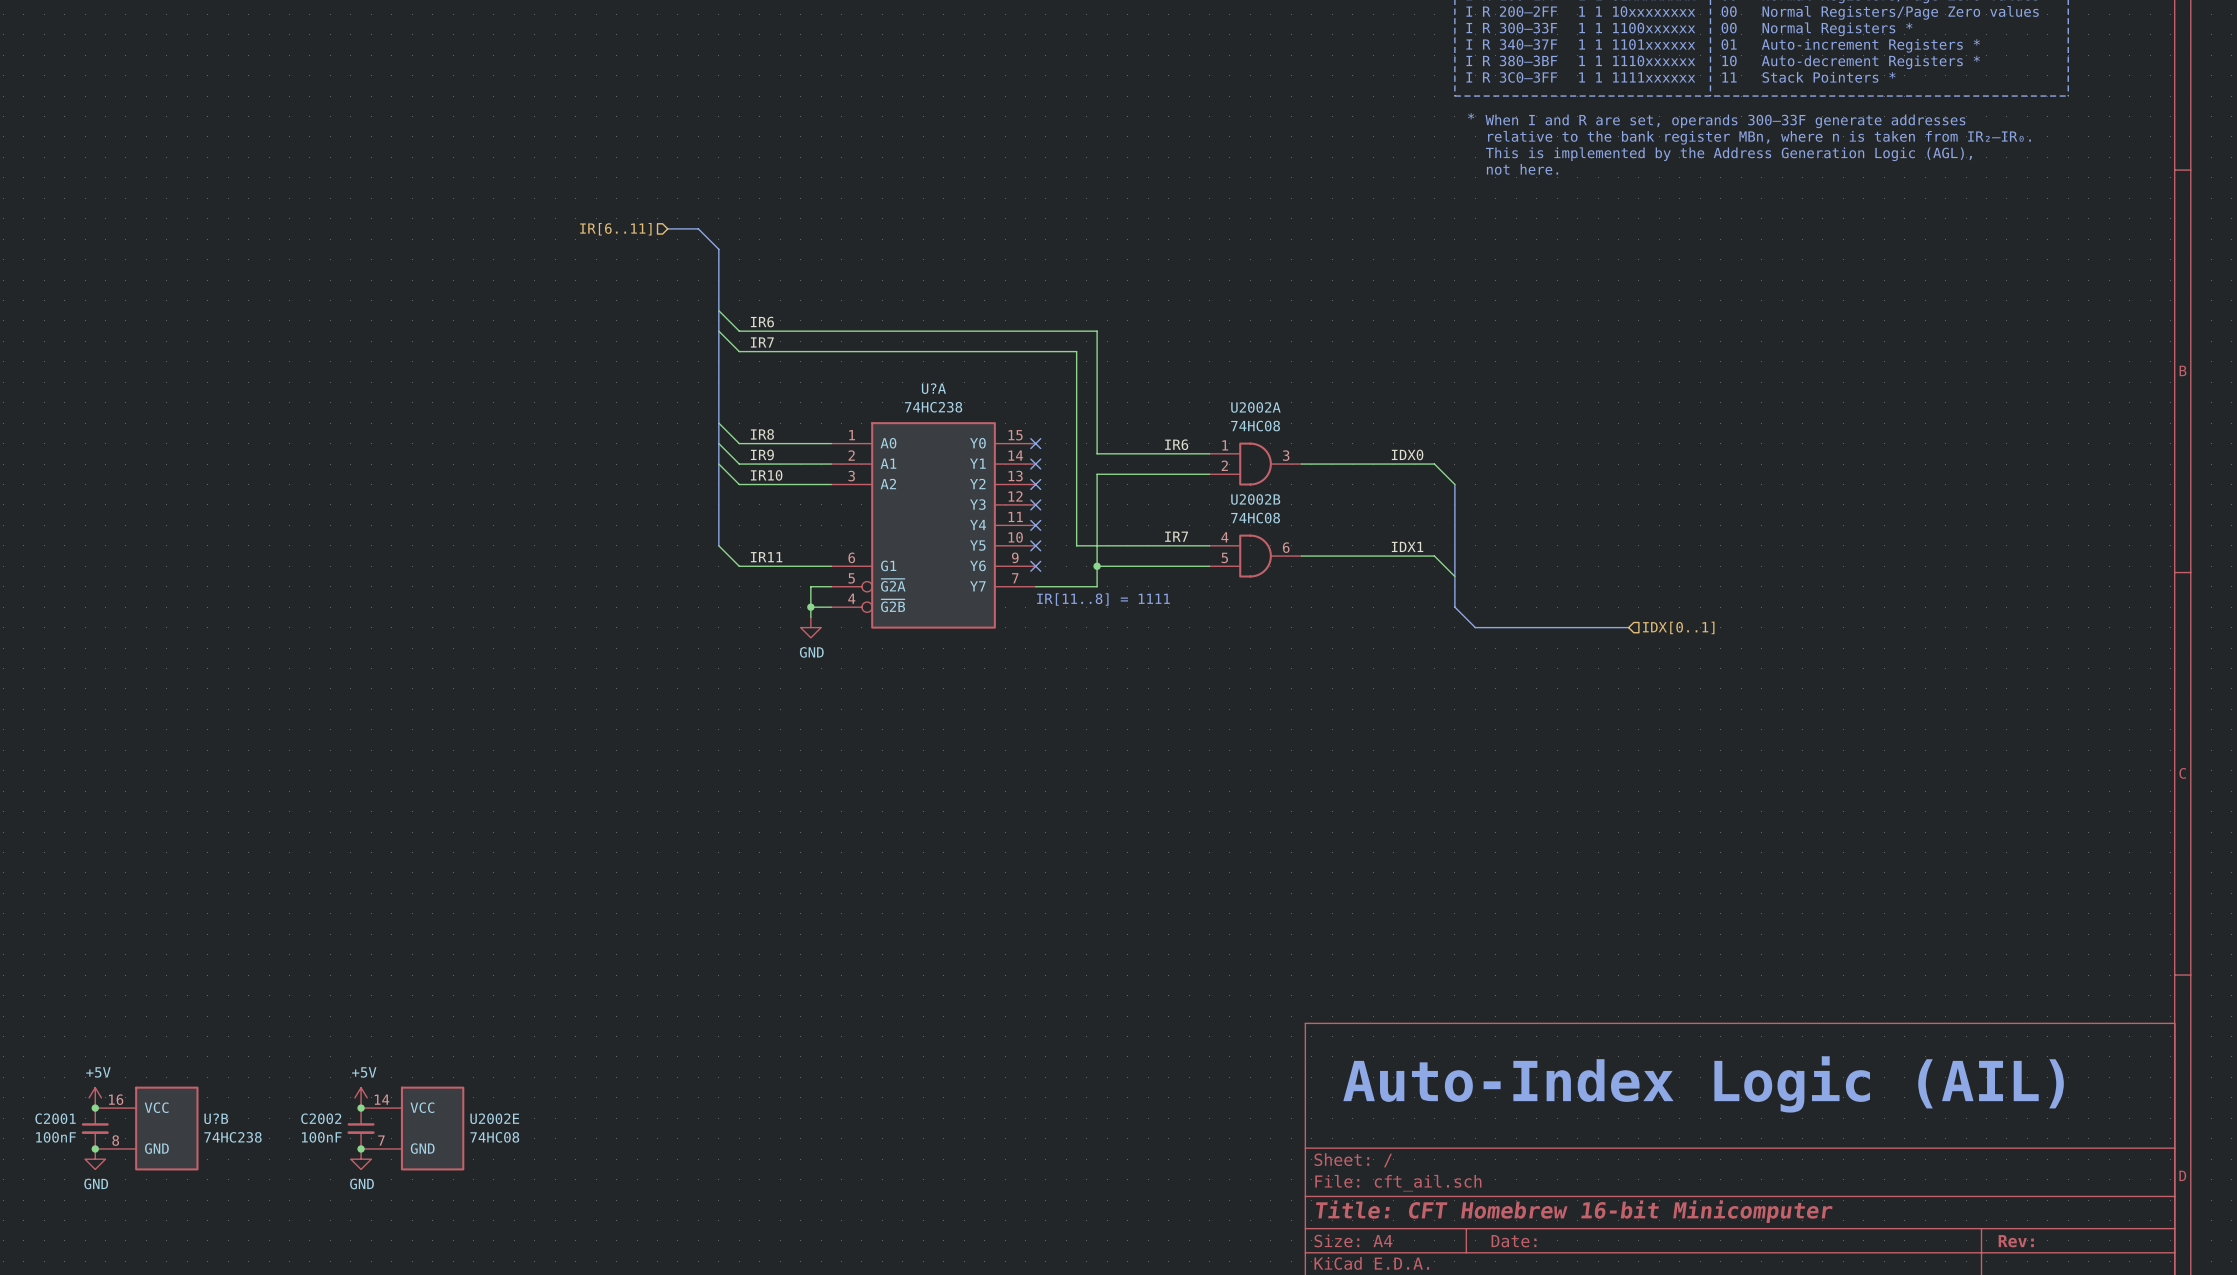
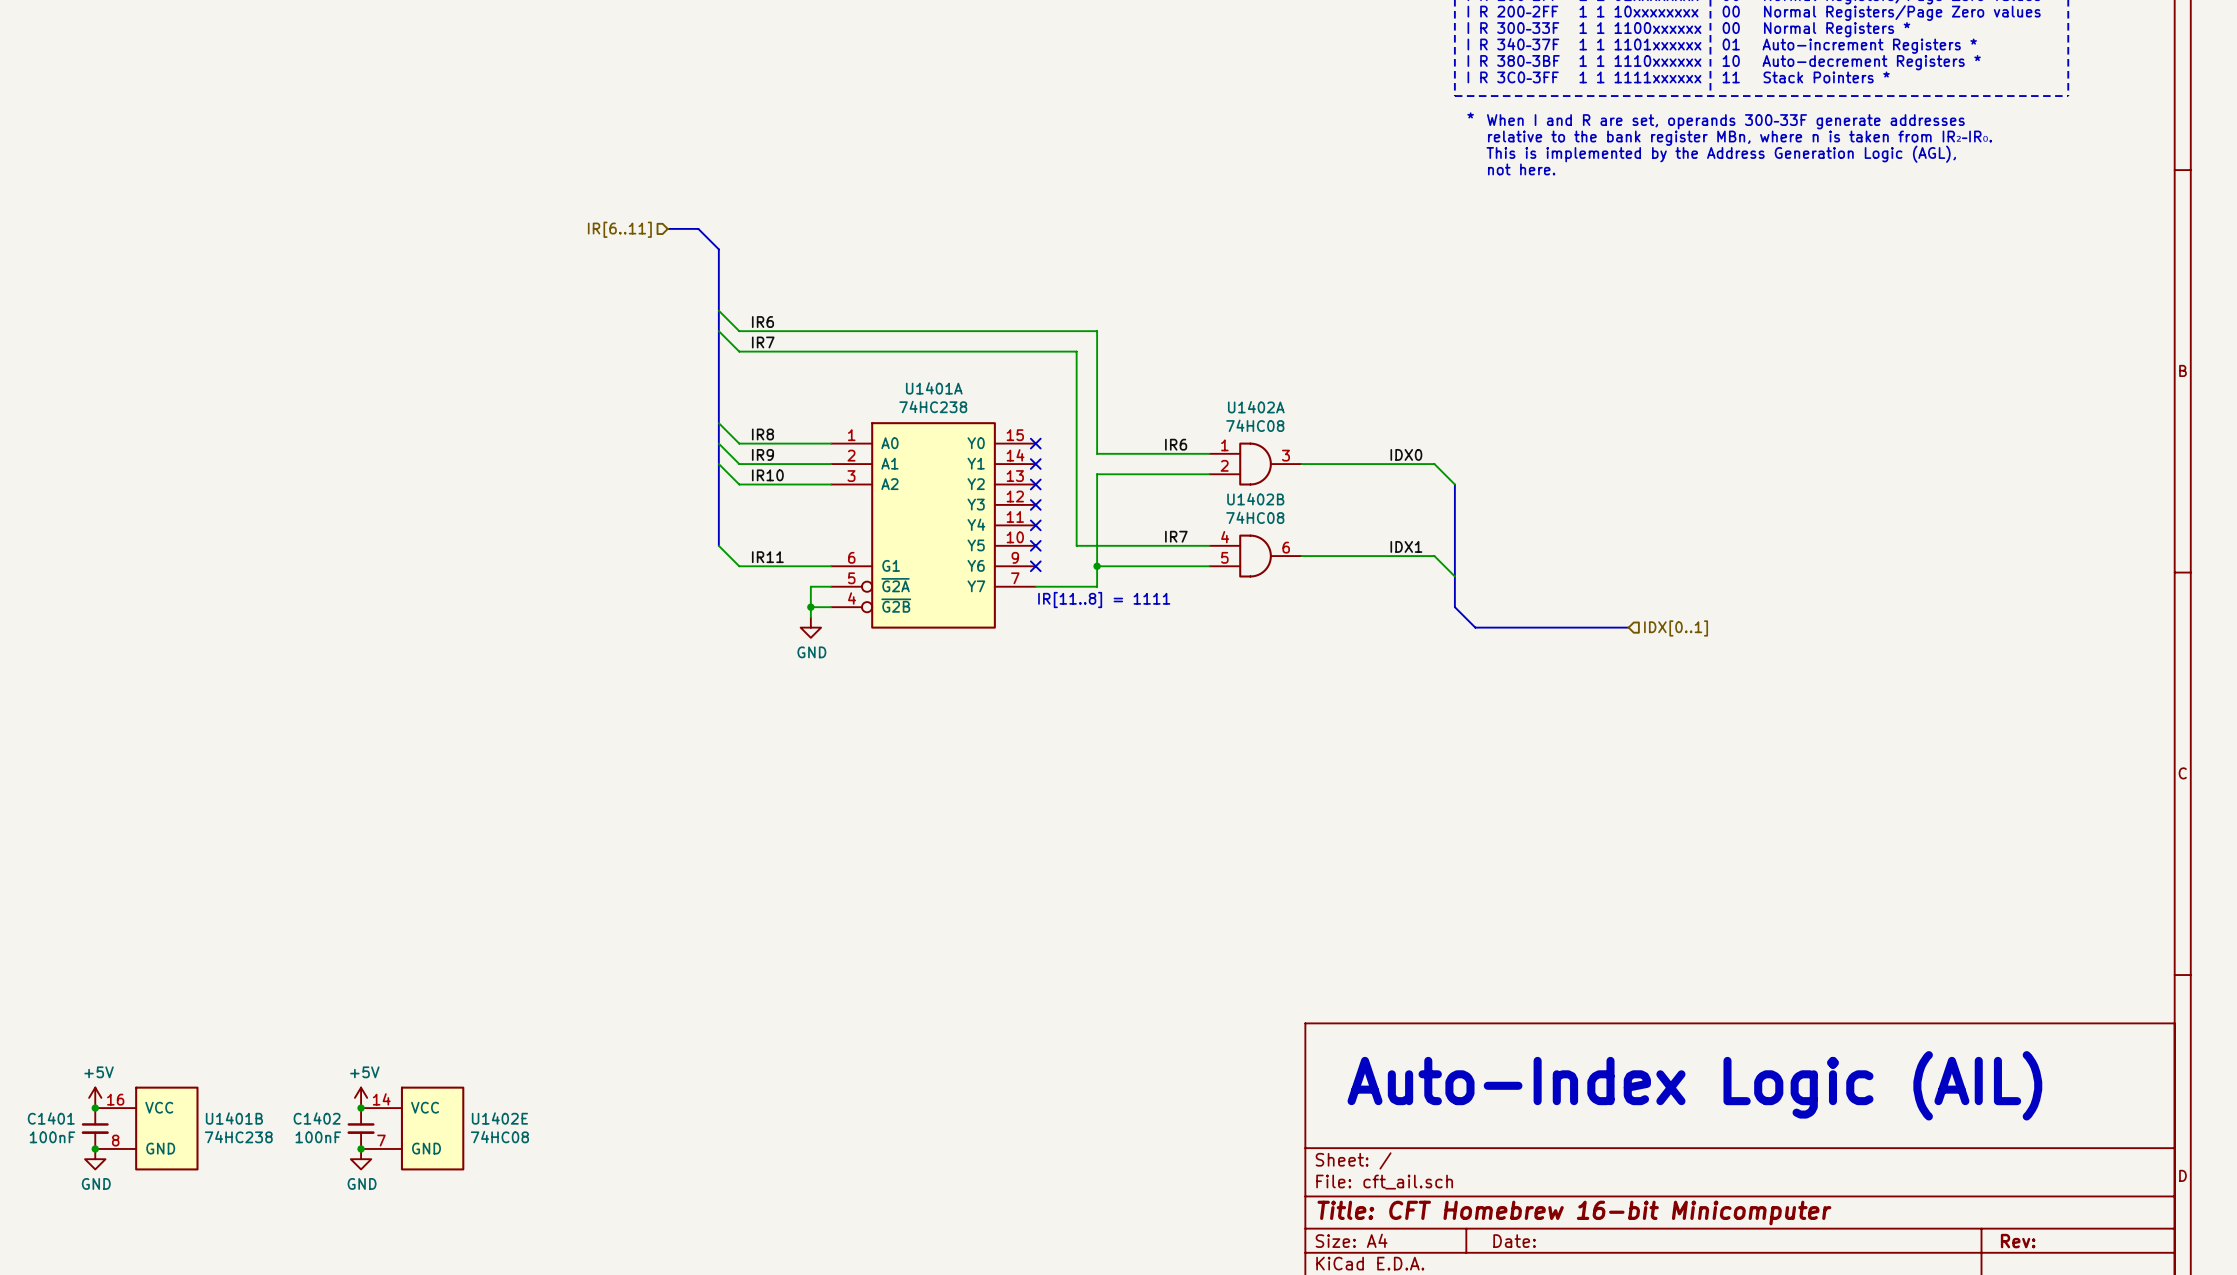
U?A name: U?A (933, 388) -> U1401A (934, 388)
U2002A name: U2002A (1255, 407) -> U1402A (1256, 407)
U2002B name: U2002B (1255, 499) -> U1402B (1255, 499)
C2001 name: C2001 (55, 1118) -> C1401 (51, 1118)
U?B name: U?B (216, 1118) -> U1401B (234, 1118)
C2002 name: C2002 (321, 1118) -> C1402 (317, 1118)
U2002E name: U2002E (494, 1118) -> U1402E (499, 1118)

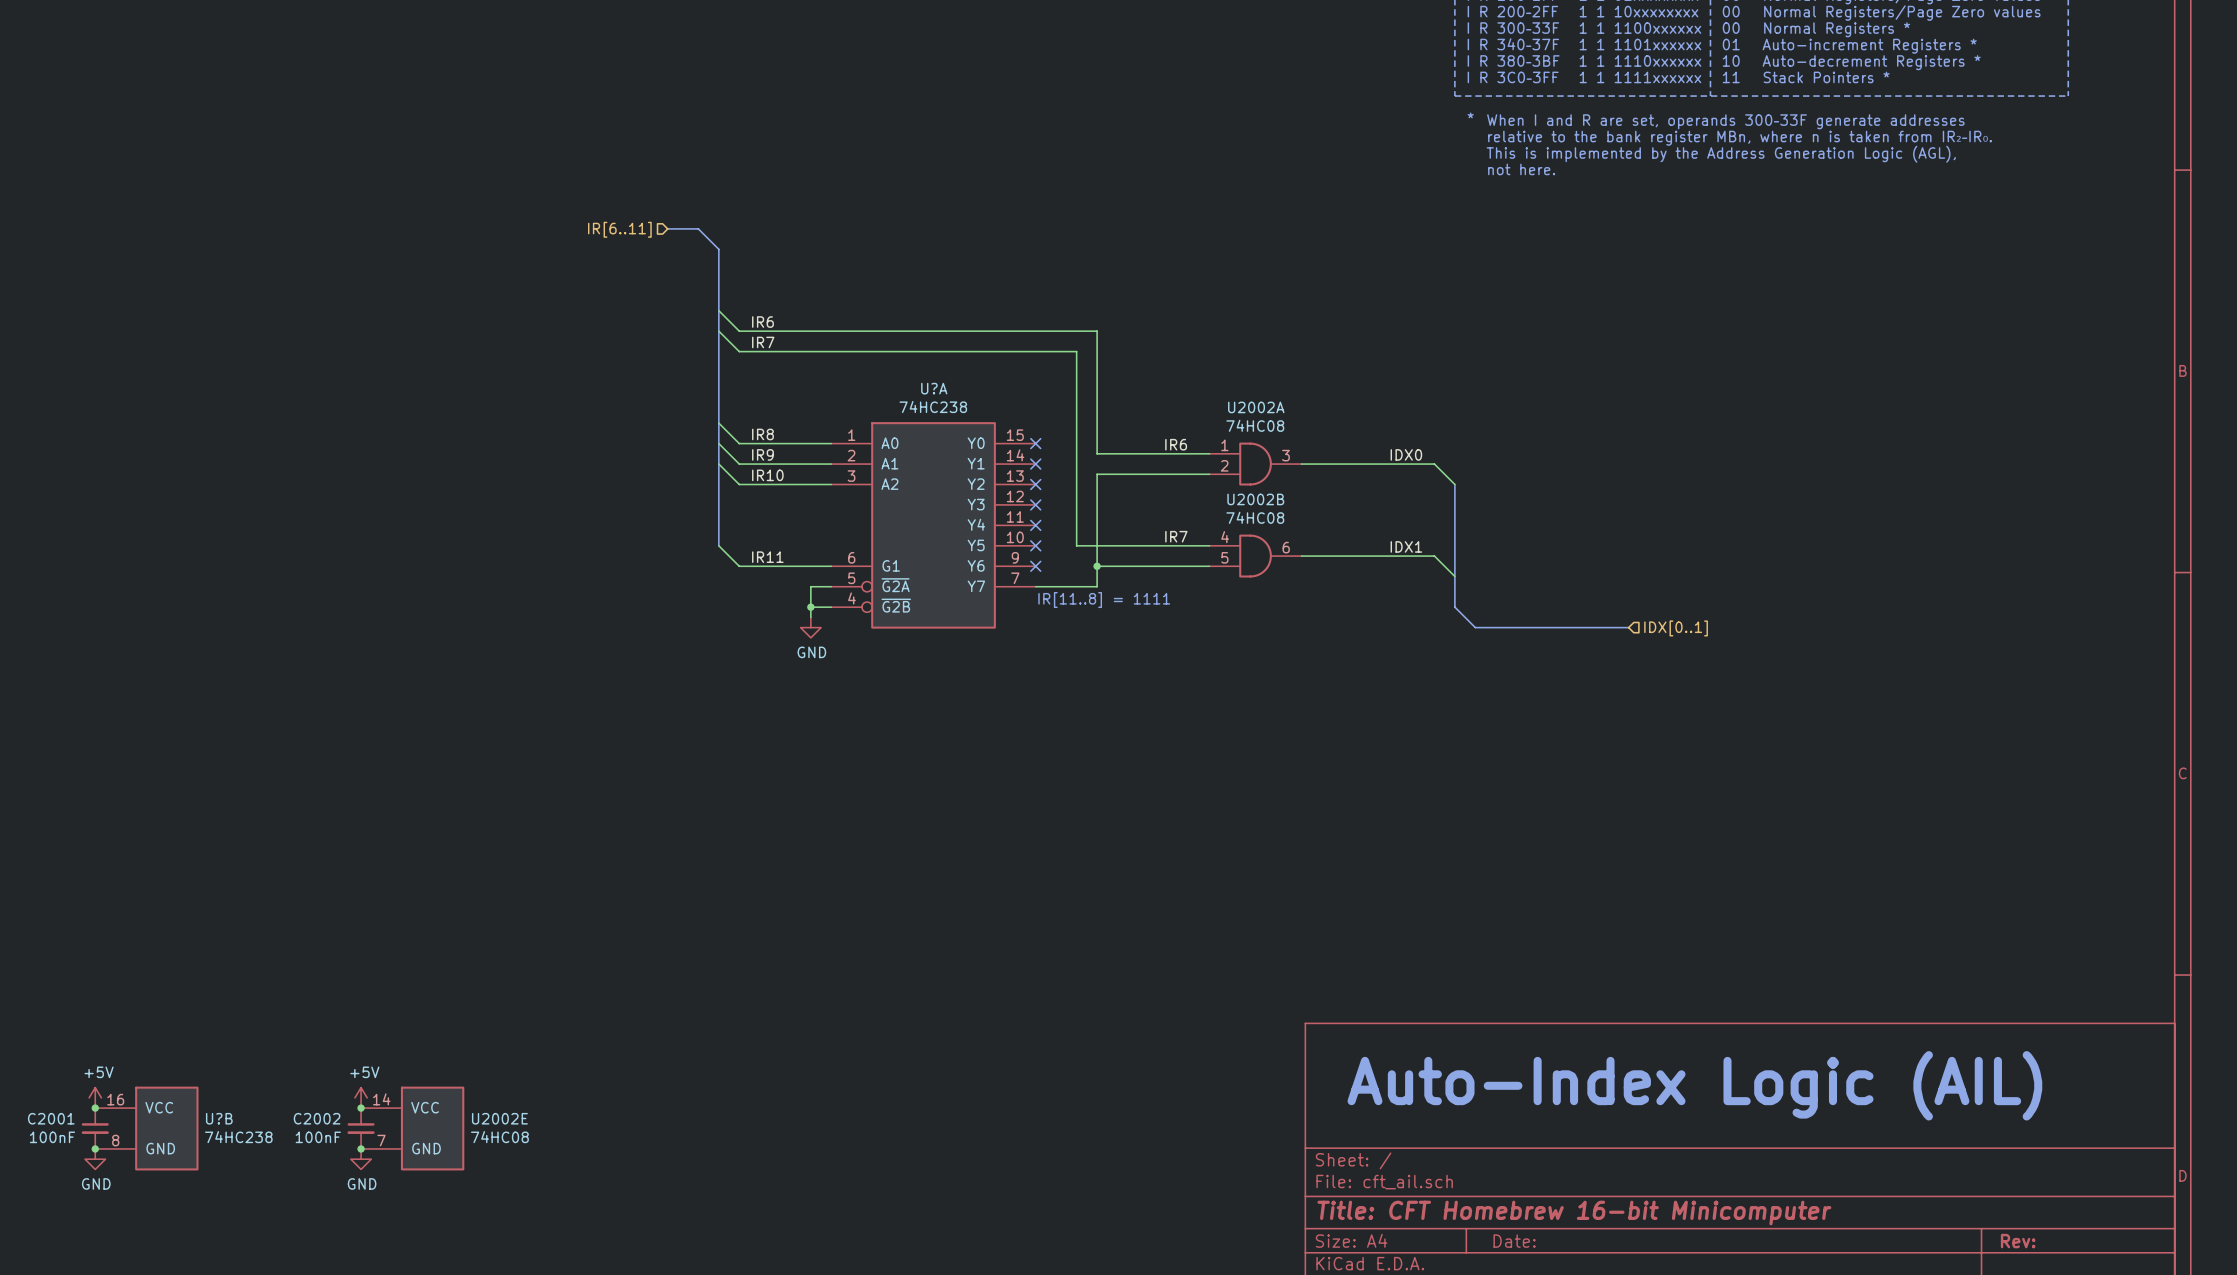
U1401A name: U1401A (934, 388) -> U?A (934, 388)
U1402A name: U1402A (1256, 407) -> U2002A (1256, 407)
U1402B name: U1402B (1255, 499) -> U2002B (1255, 499)
C1401 name: C1401 (51, 1118) -> C2001 (51, 1118)
U1401B name: U1401B (234, 1118) -> U?B (219, 1118)
C1402 name: C1402 (317, 1118) -> C2002 (317, 1118)
U1402E name: U1402E (499, 1118) -> U2002E (499, 1118)

